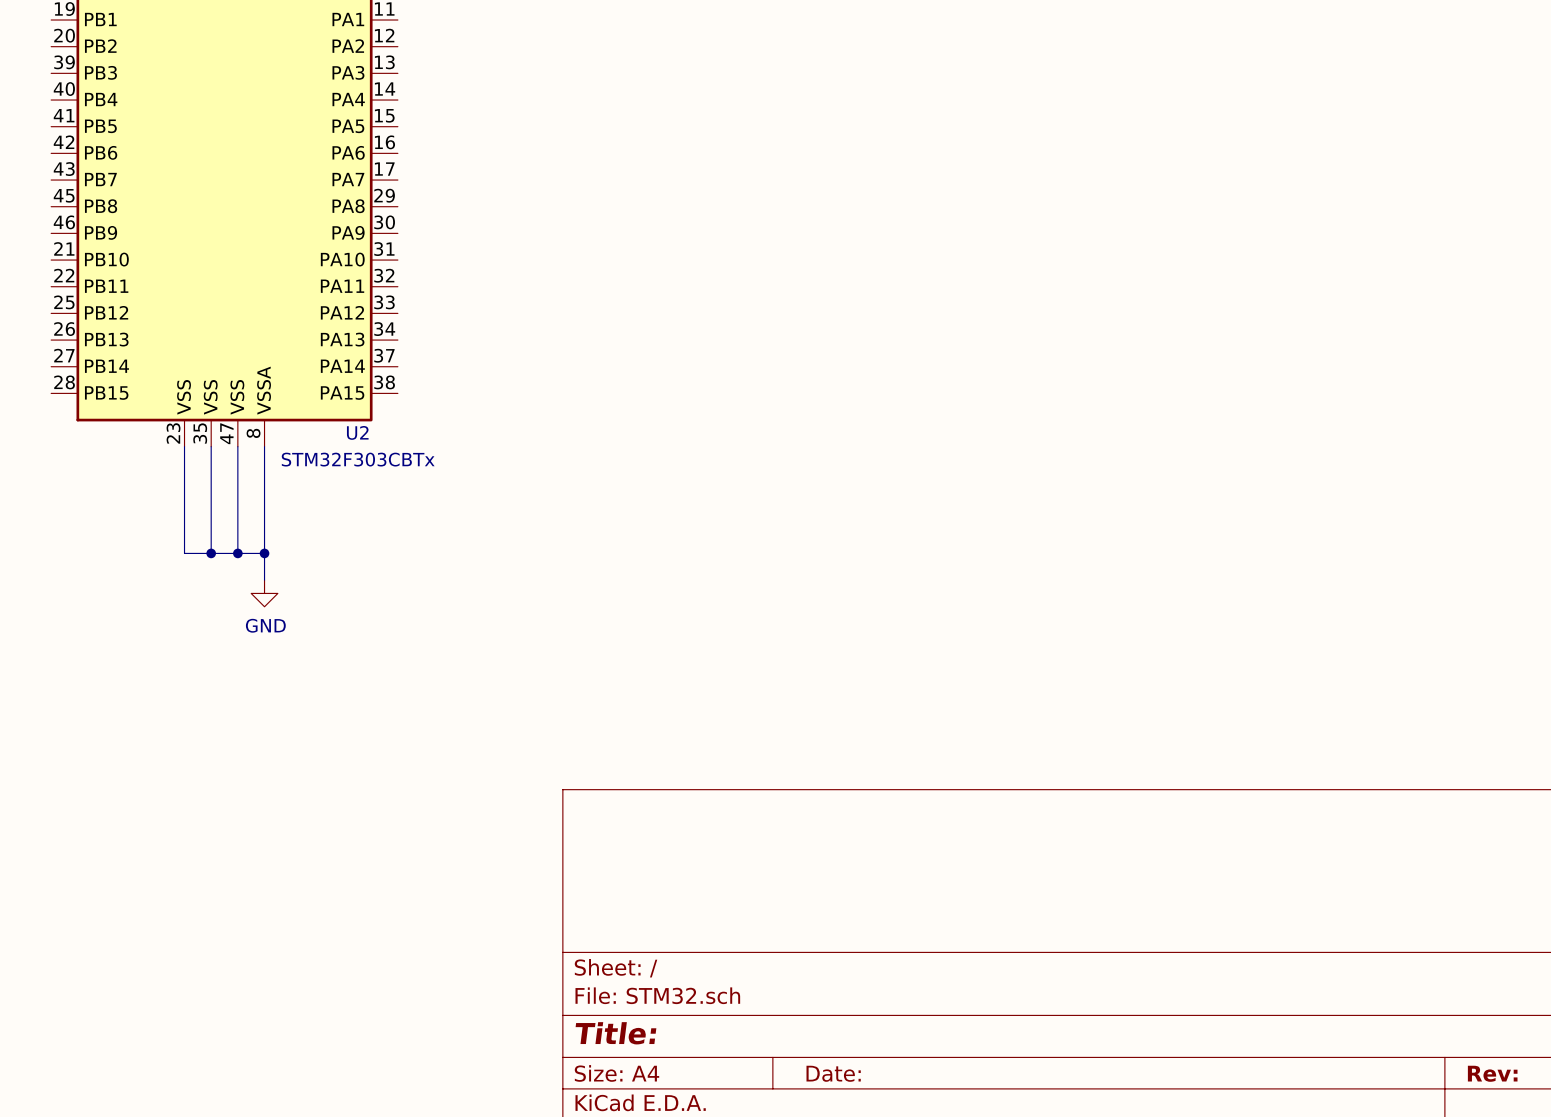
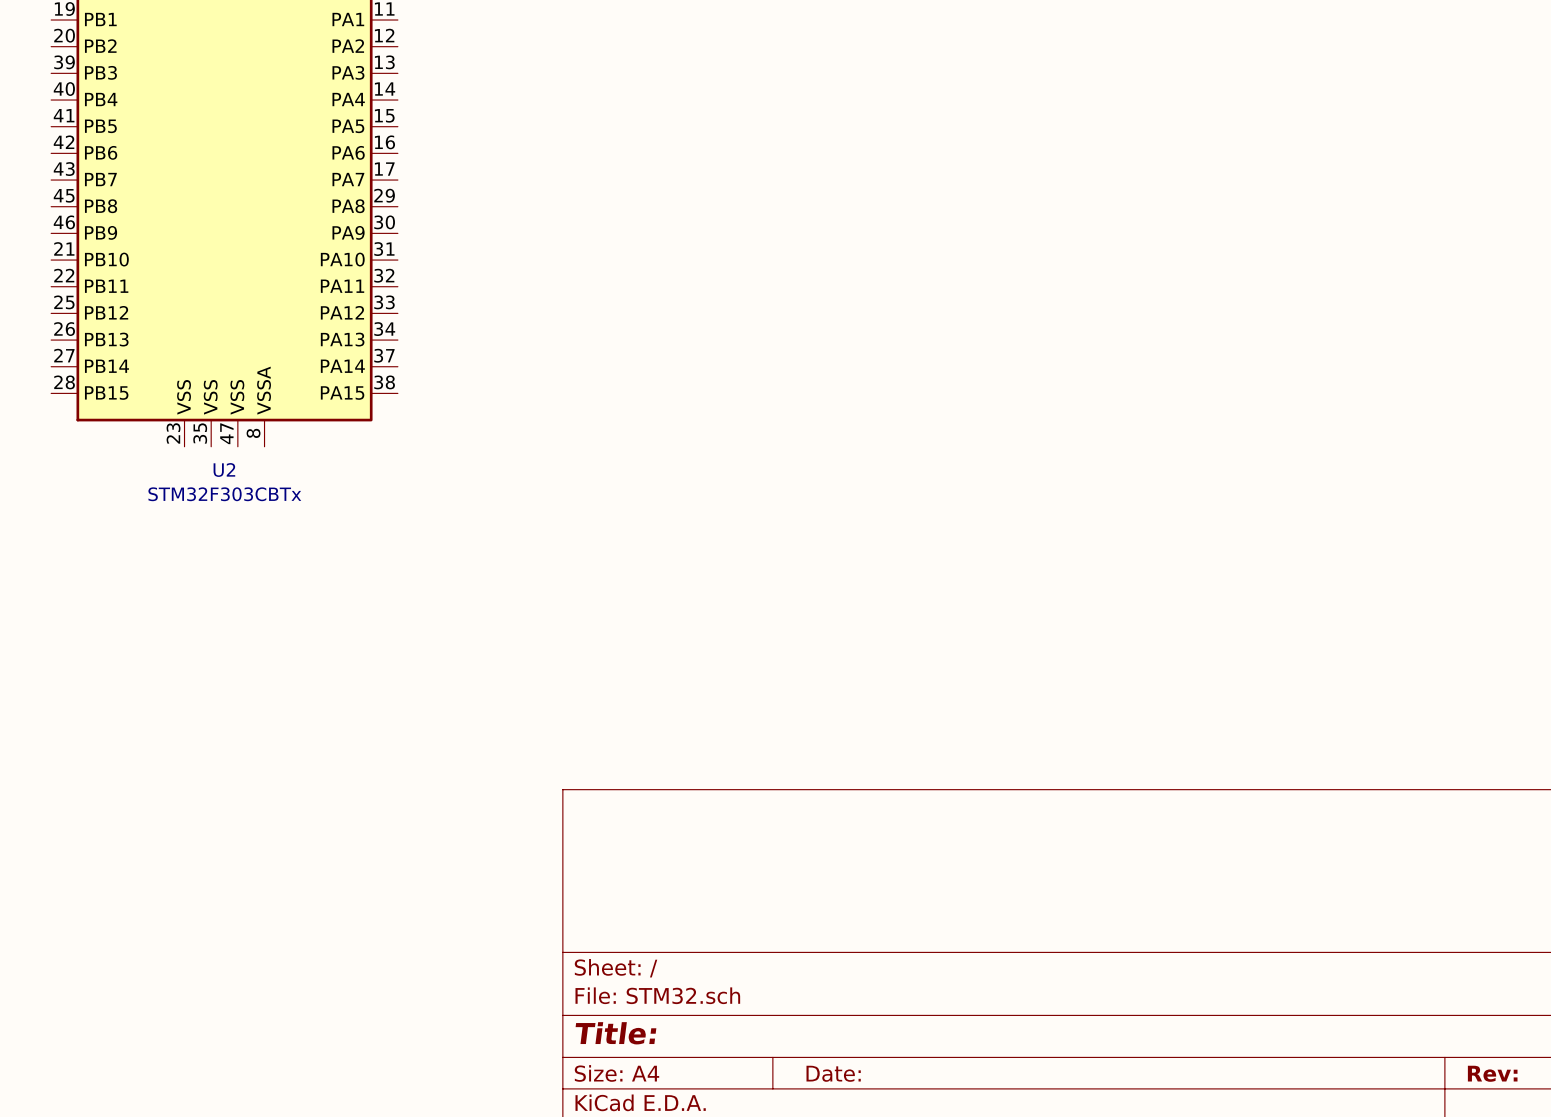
U2 name position: U2 (357, 432) -> U2 (224, 469)
wire: (184, 446) (184, 553) (264, 553) -> none
wire: (211, 446) (211, 553) -> none
wire: (237, 446) (237, 553) -> none
wire: (264, 446) (264, 580) -> none
U2 value position: STM32F303CBTx (358, 459) -> STM32F303CBTx (224, 494)
junction: (211, 553) -> none
junction: (237, 553) -> none
junction: (264, 553) -> none
power symbol: GND (264, 593) -> none

